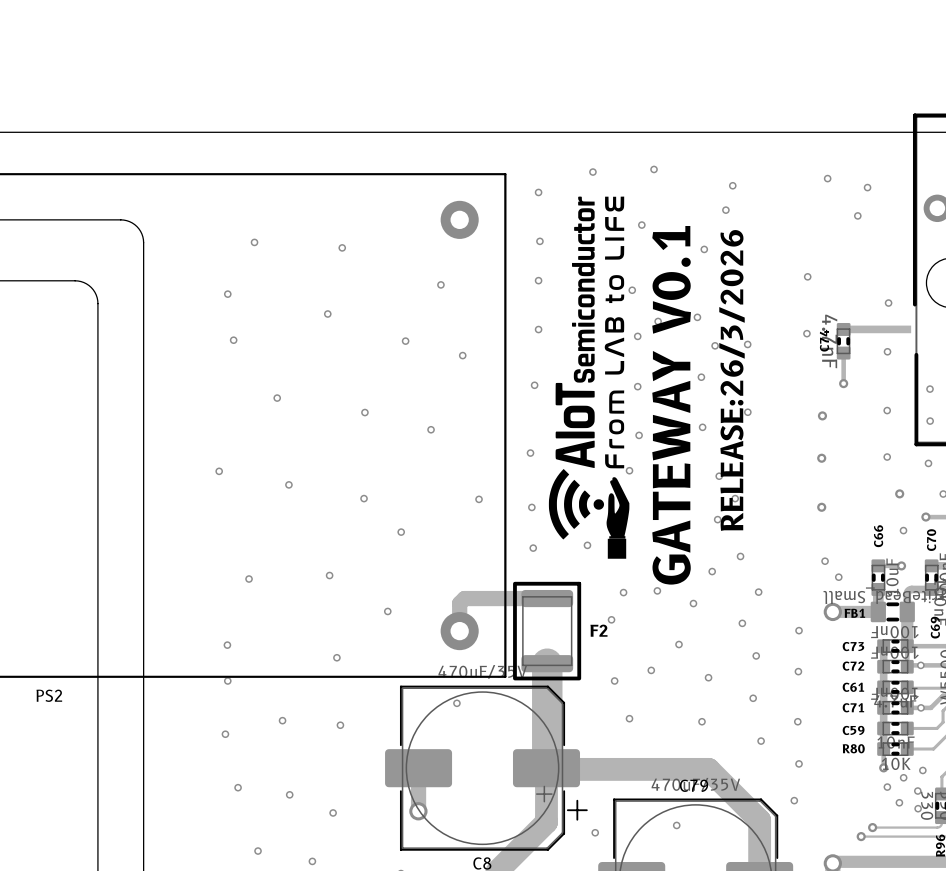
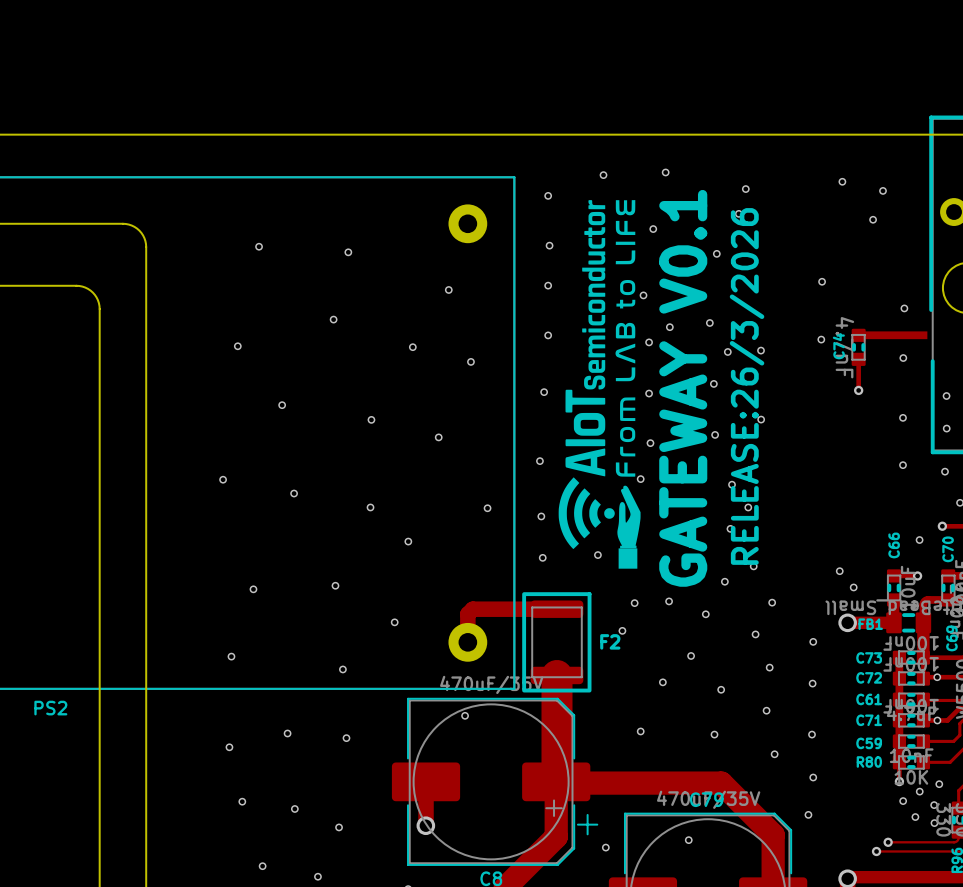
via: (227, 294) -> none
via: (822, 415) -> none
via: (821, 458) -> none
via: (899, 493) -> none
via: (821, 507) -> none
via: (227, 680) -> none
via: (614, 680) -> none

